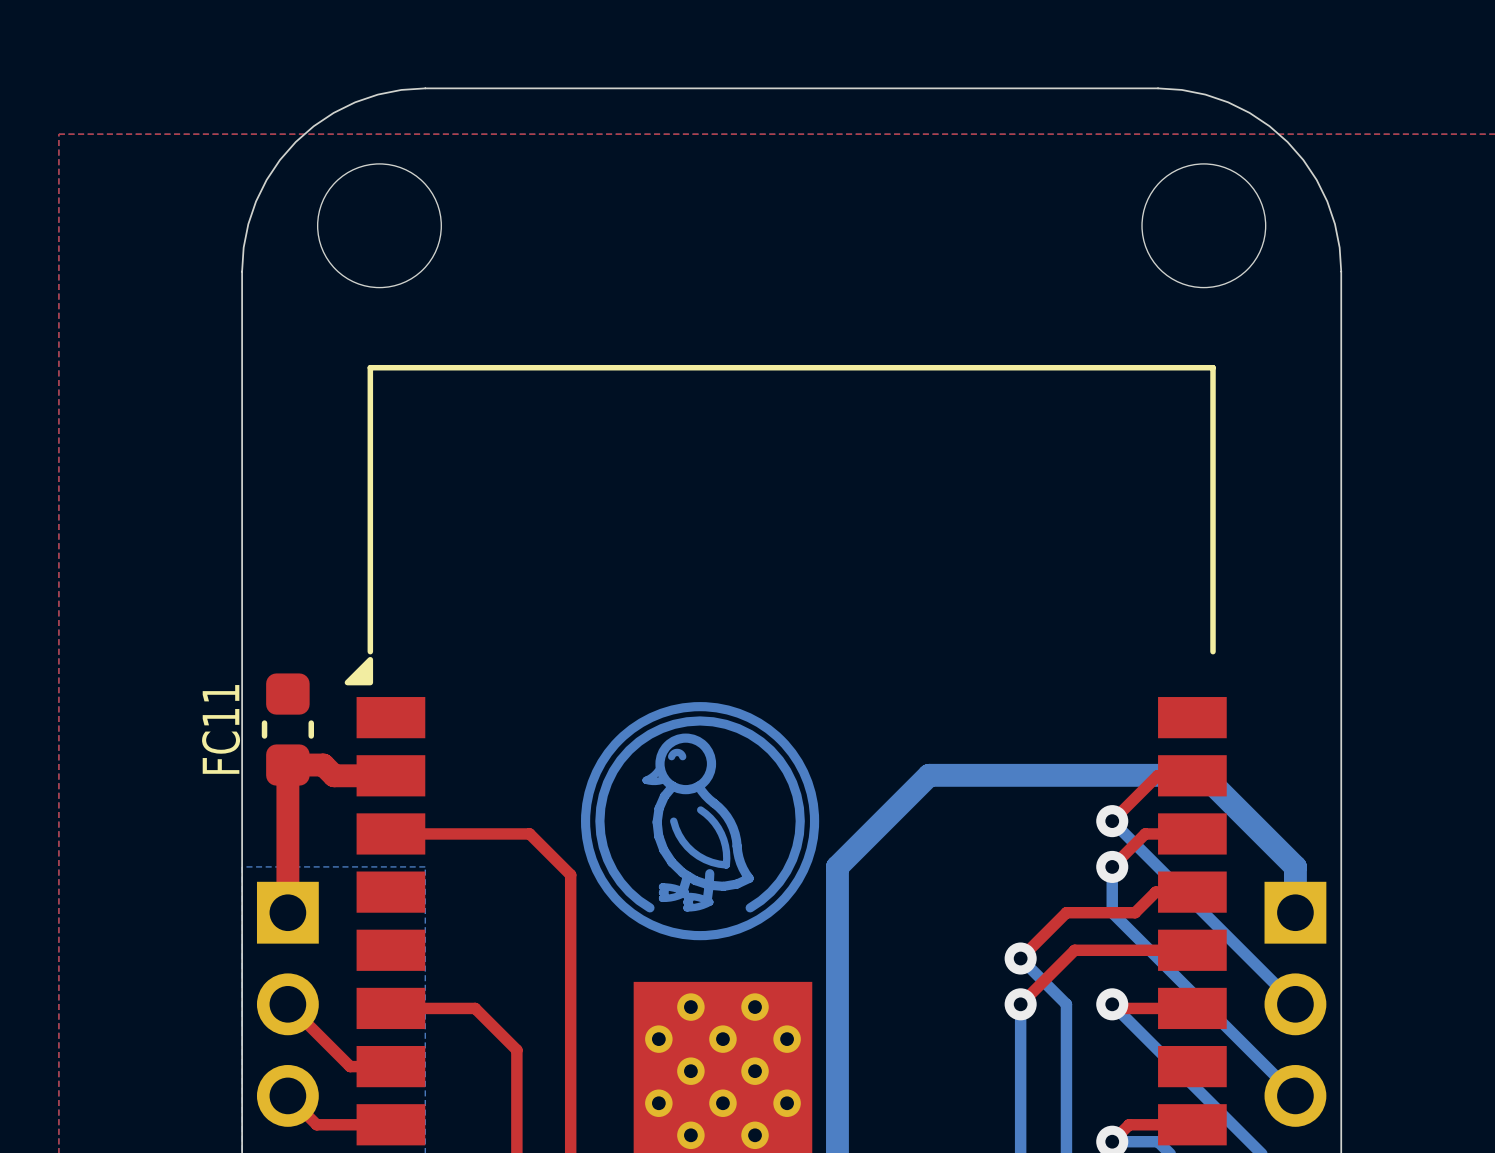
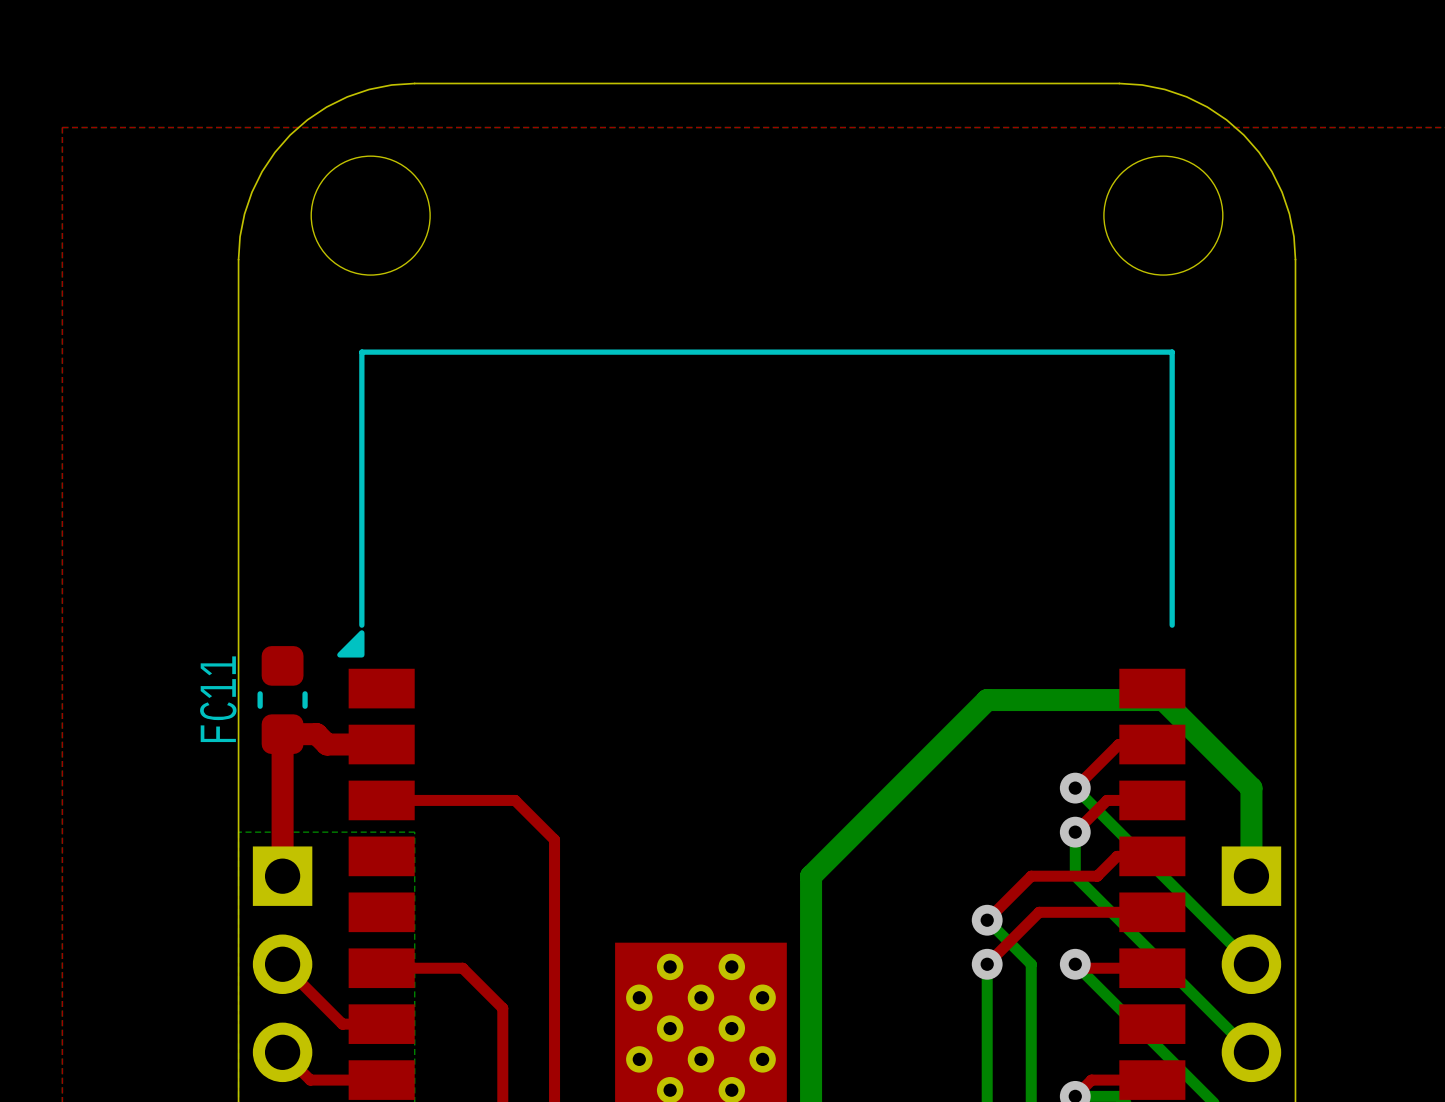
drawing: [580, 702, 820, 941] -> none
bottom track: (1295, 866) (1203, 775) (929, 775) (837, 866) (837, 912) -> (1251, 832) (1251, 788) (1163, 700) (987, 700) (811, 876)

